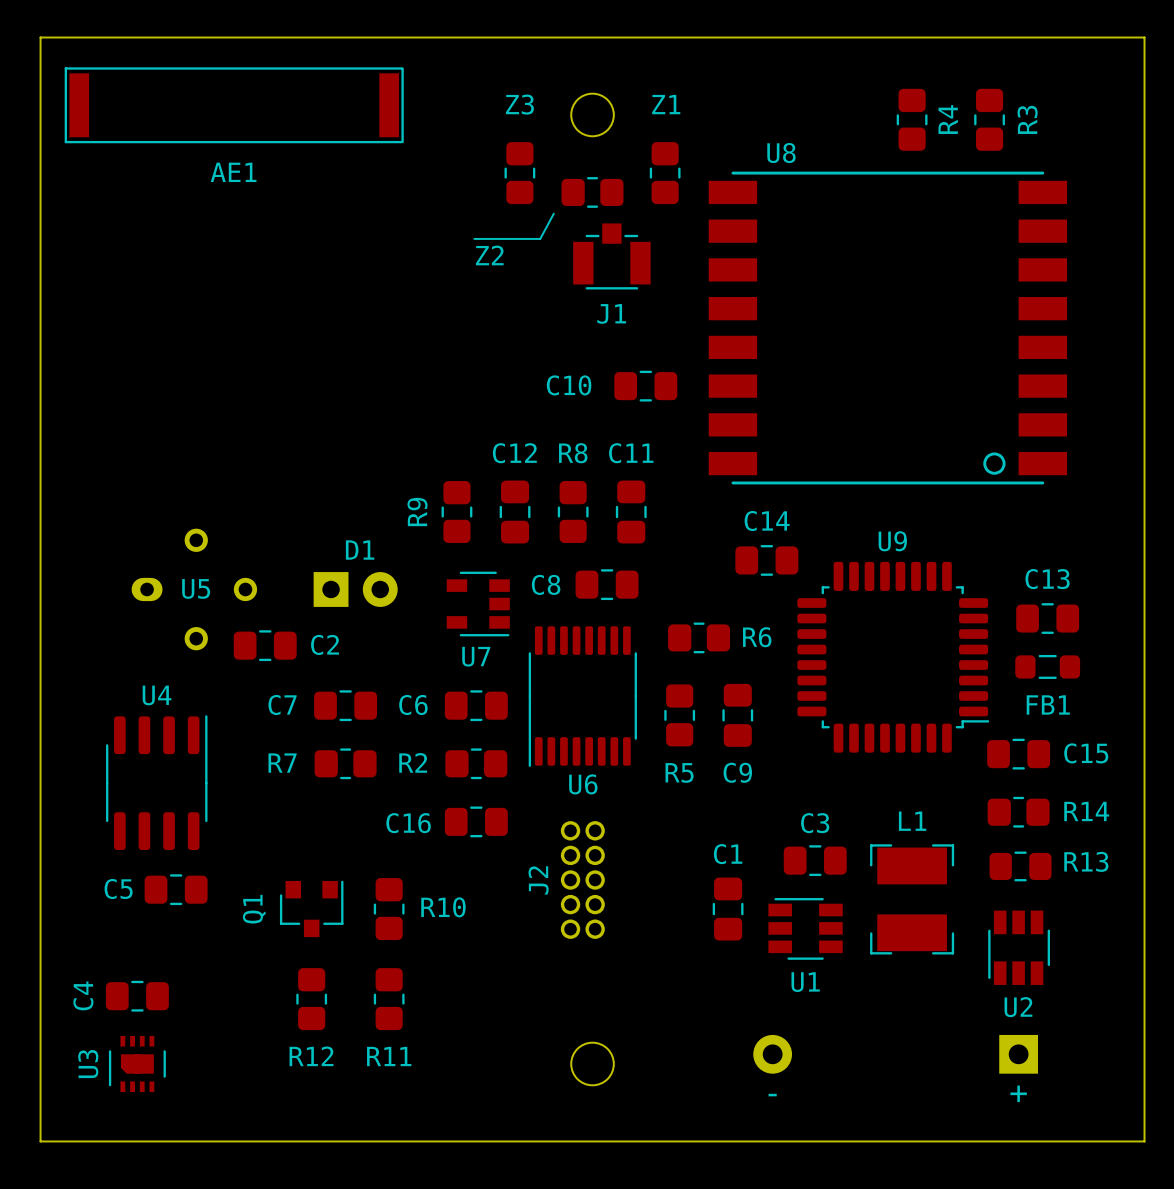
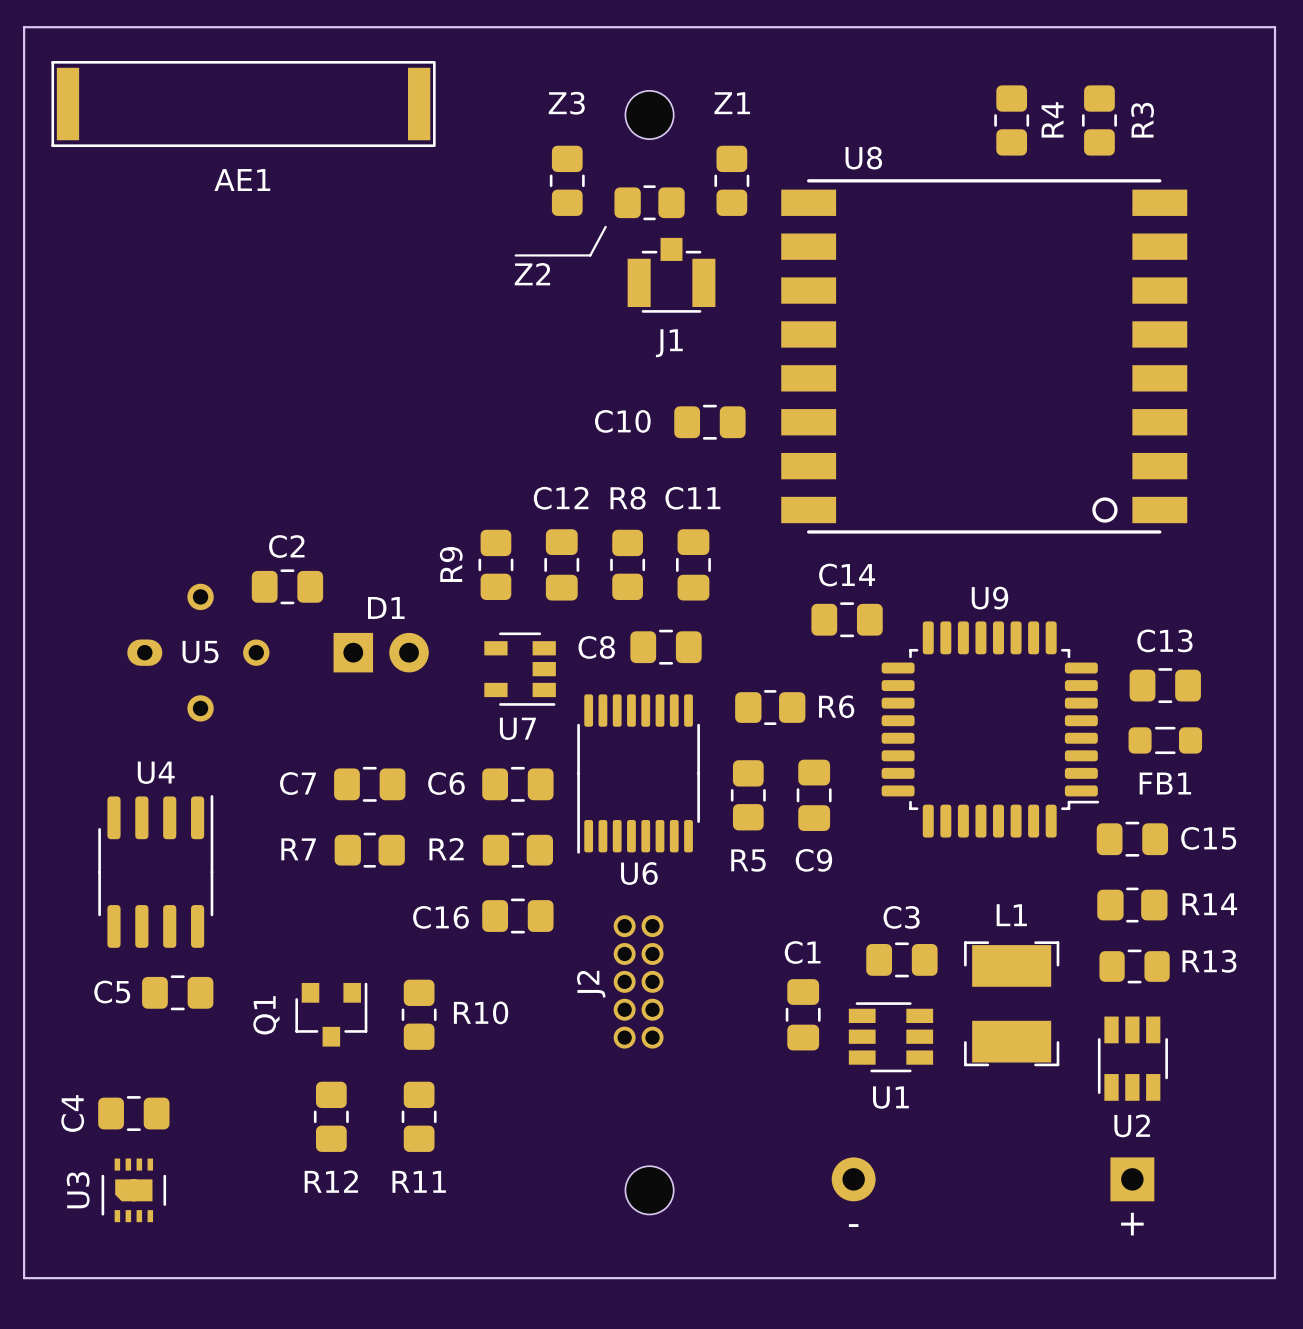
C2 name position: C2 (325, 644) -> C2 (286, 546)
C2 position: (265, 645) -> (287, 586)

